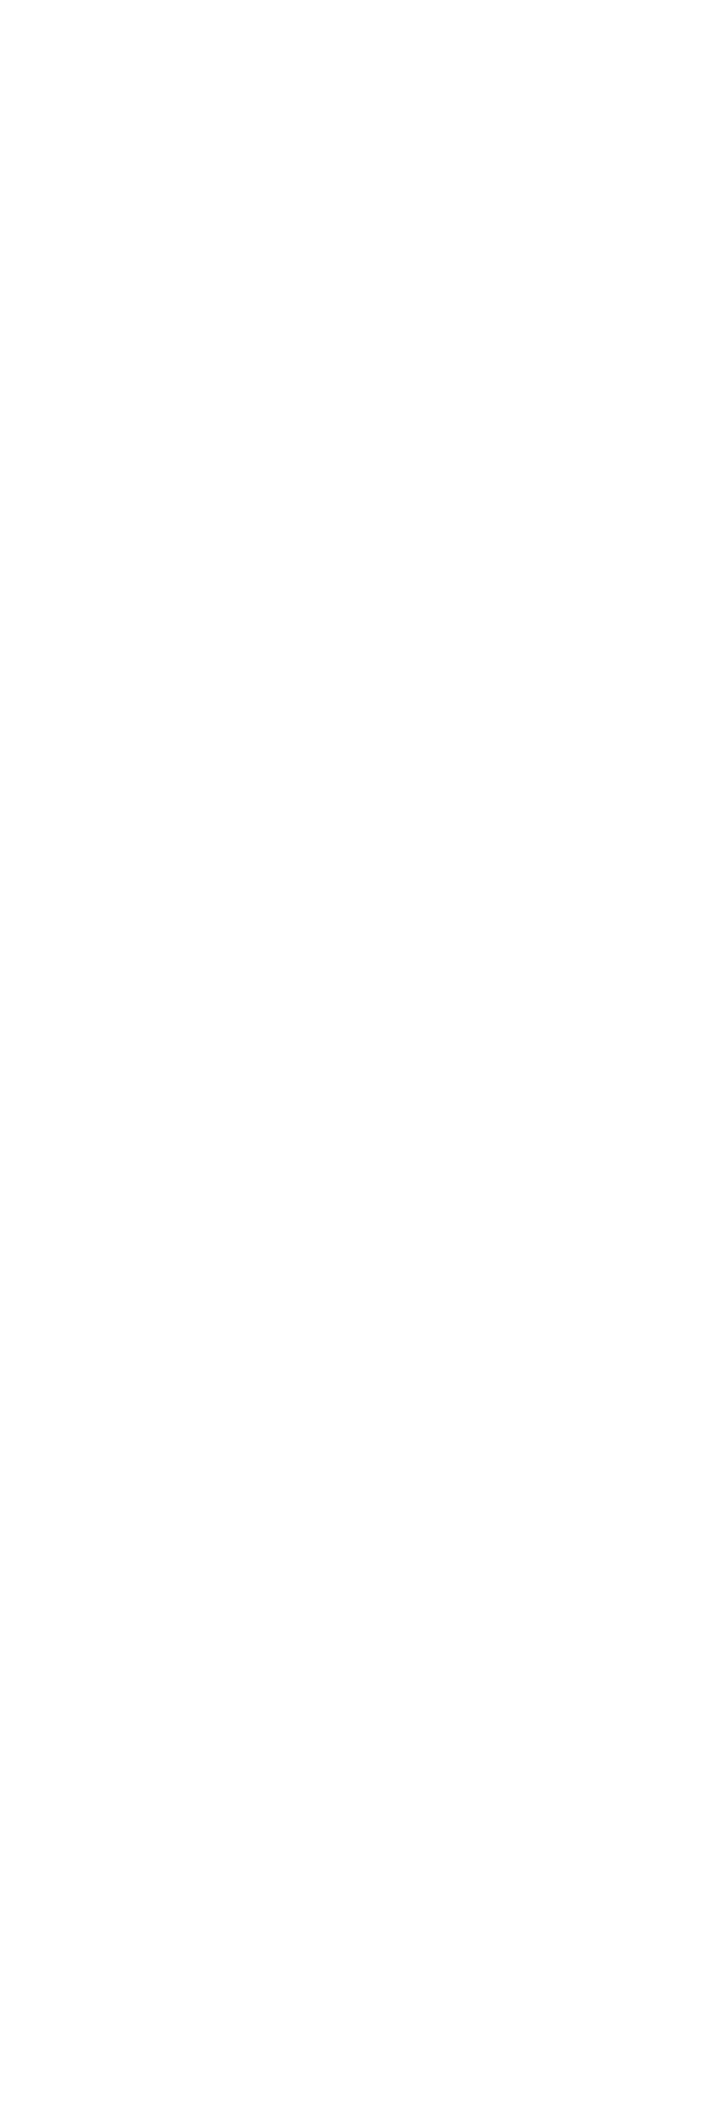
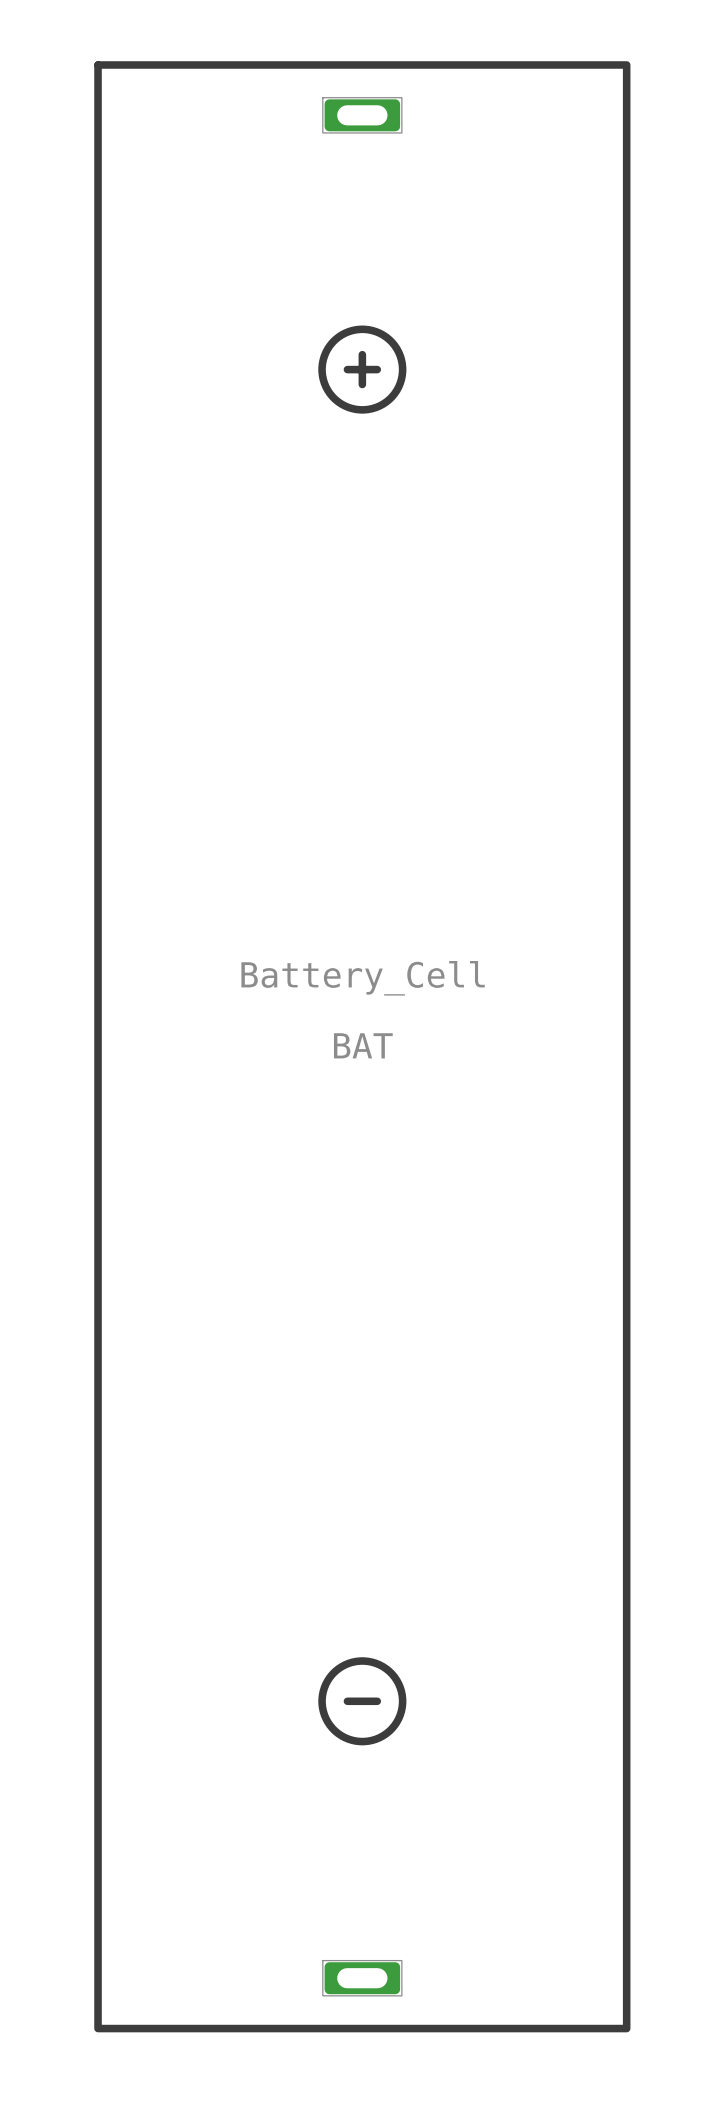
part: none -> Battery_Cell (362, 1046)

